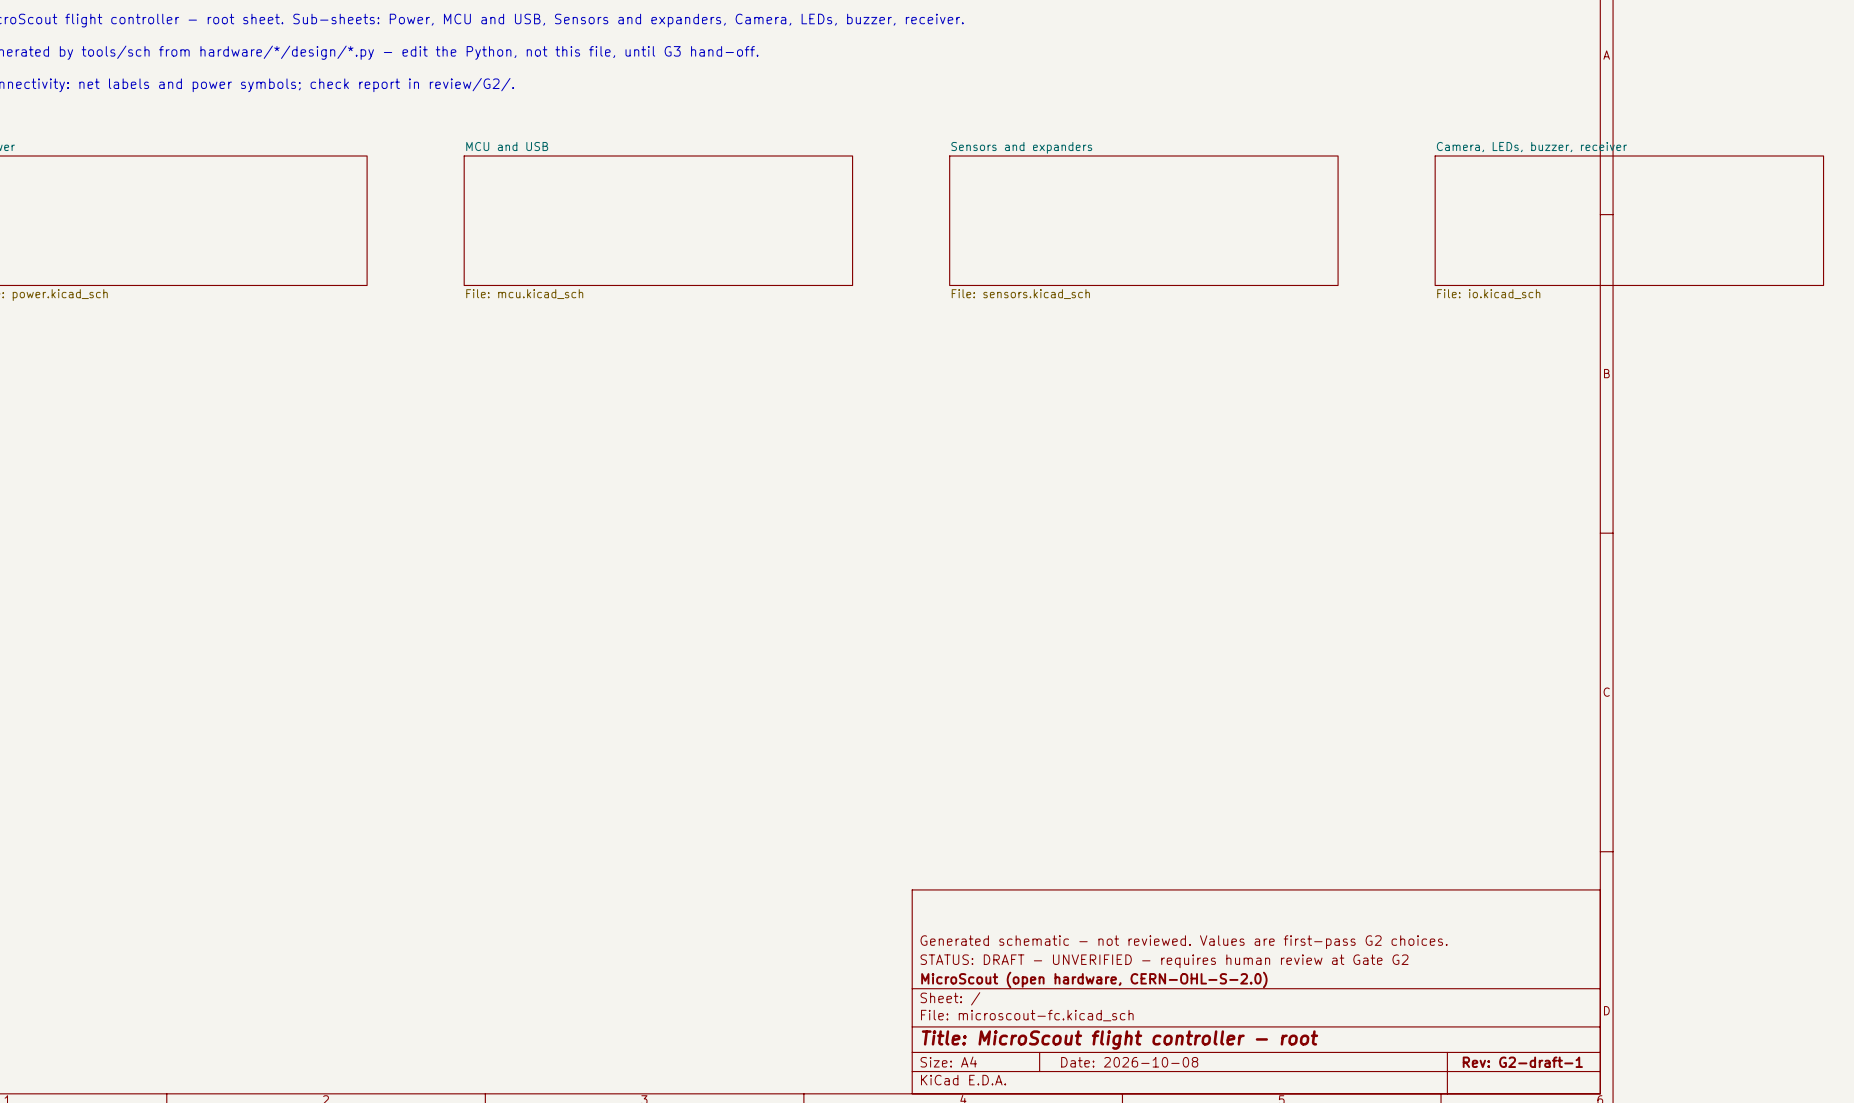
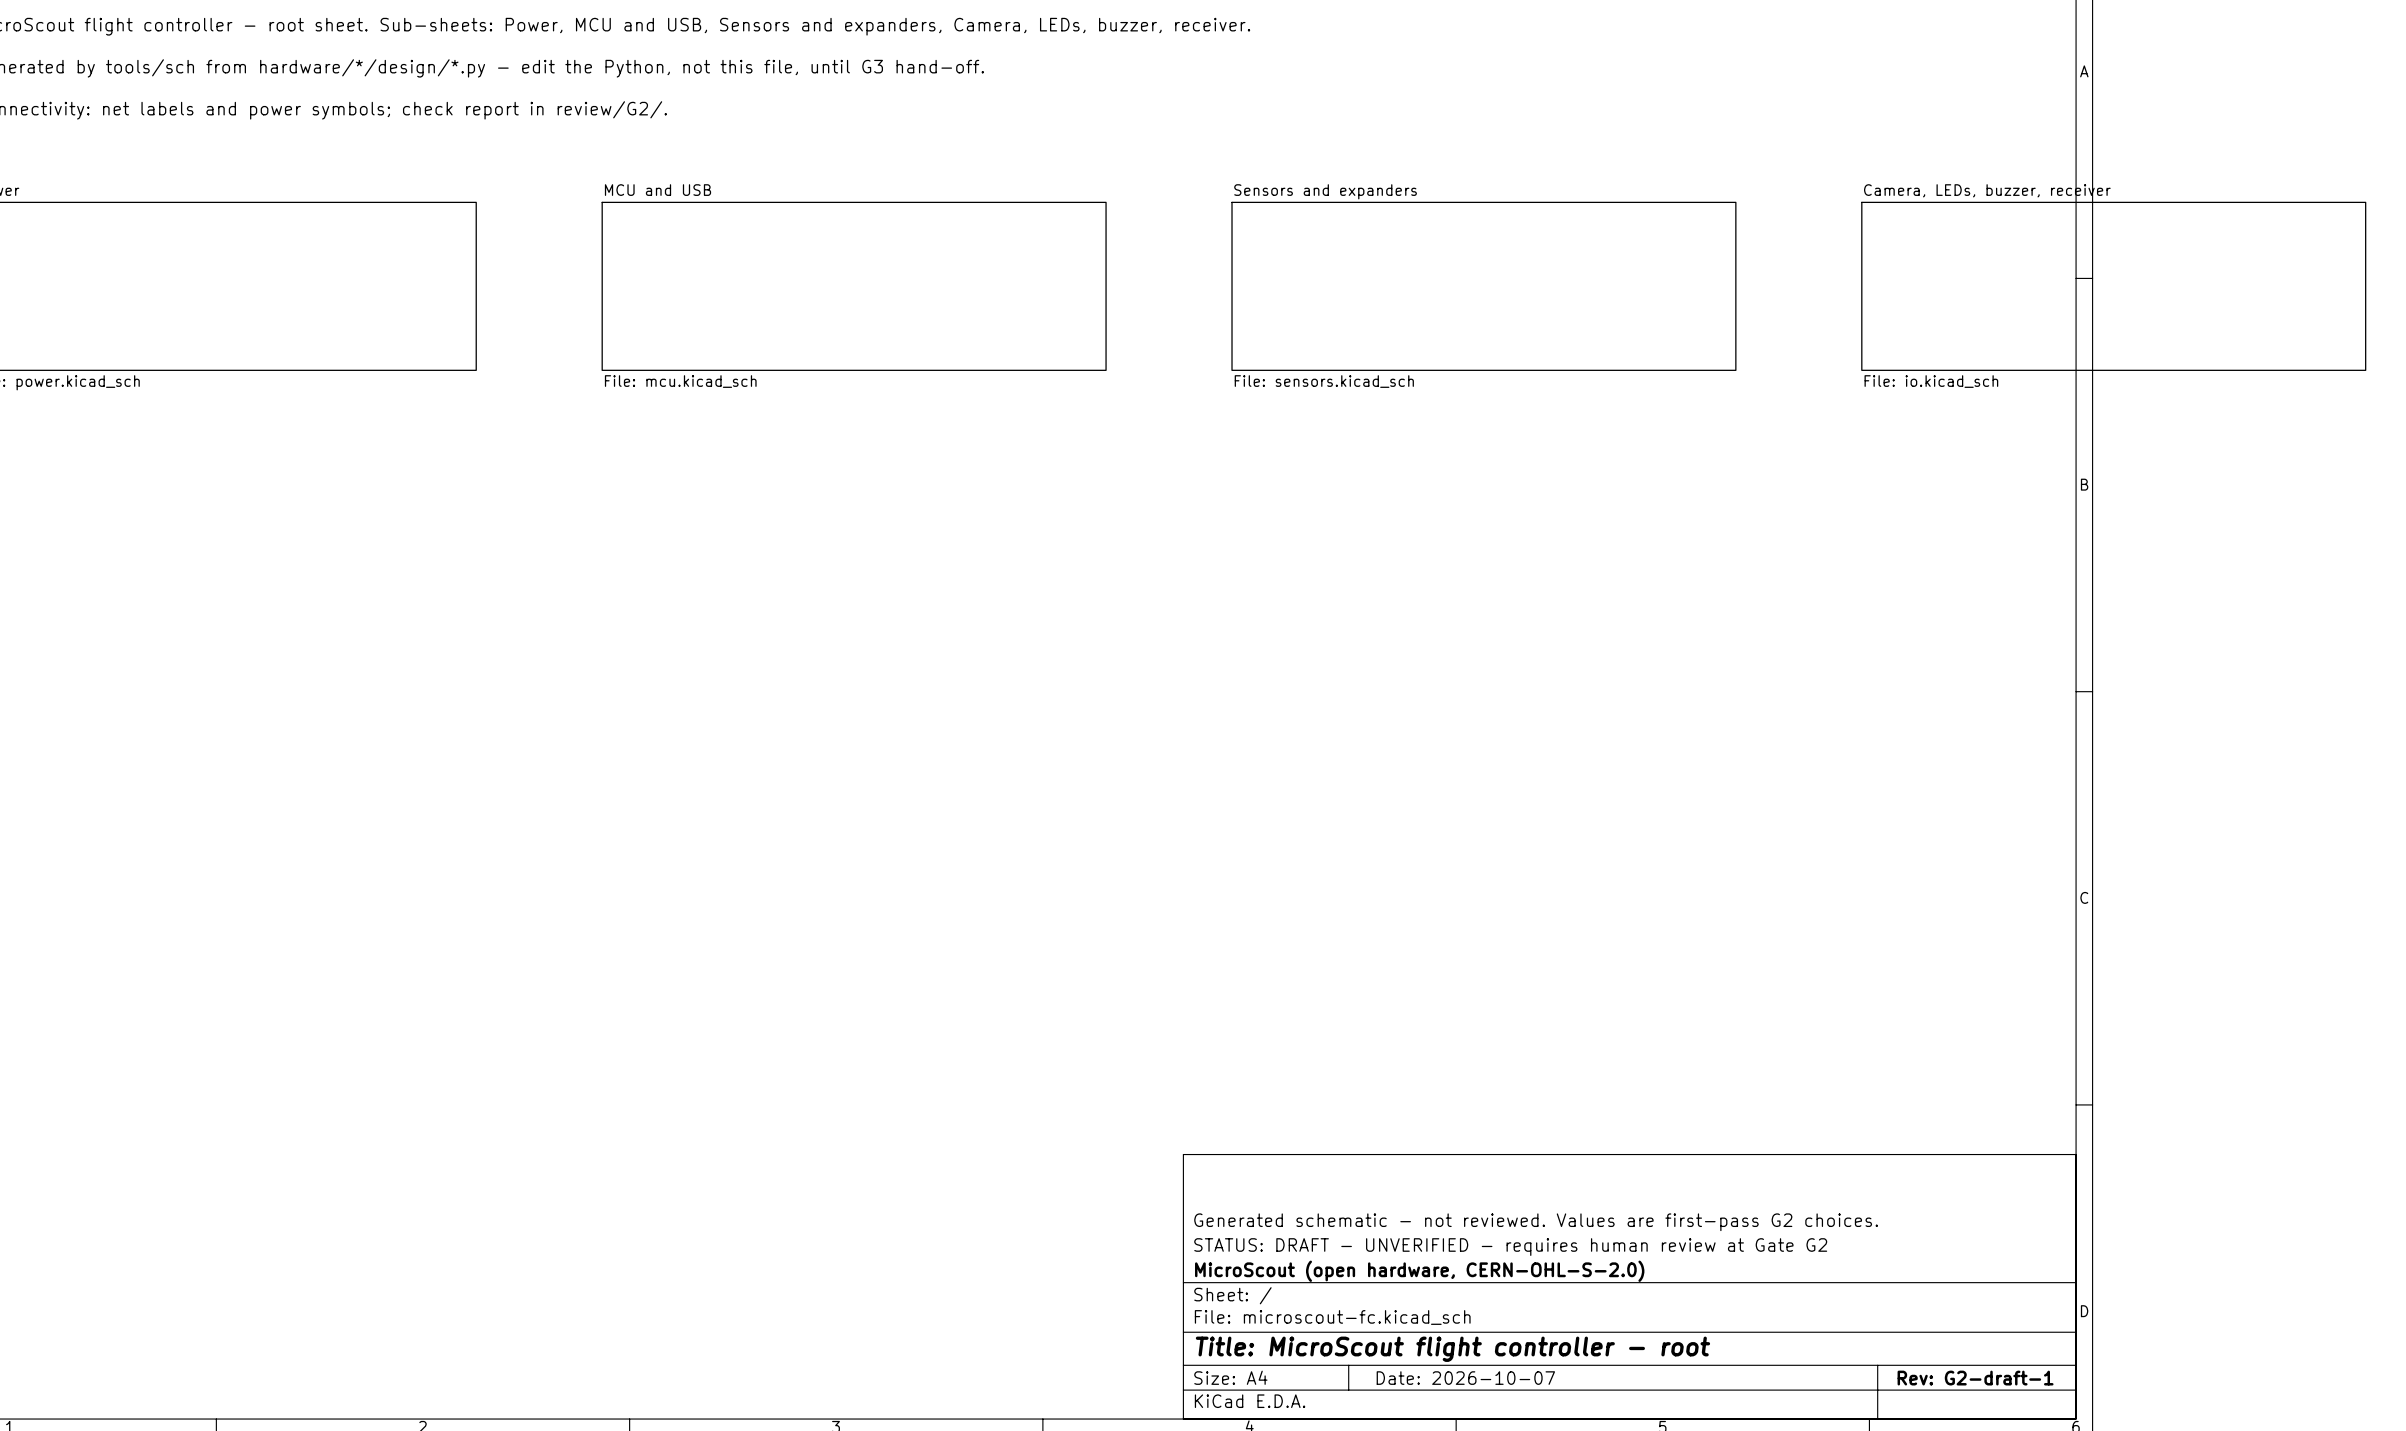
title block: Date: 2026-10-08 (1129, 1062) -> Date: 2026-10-07 (1465, 1378)

